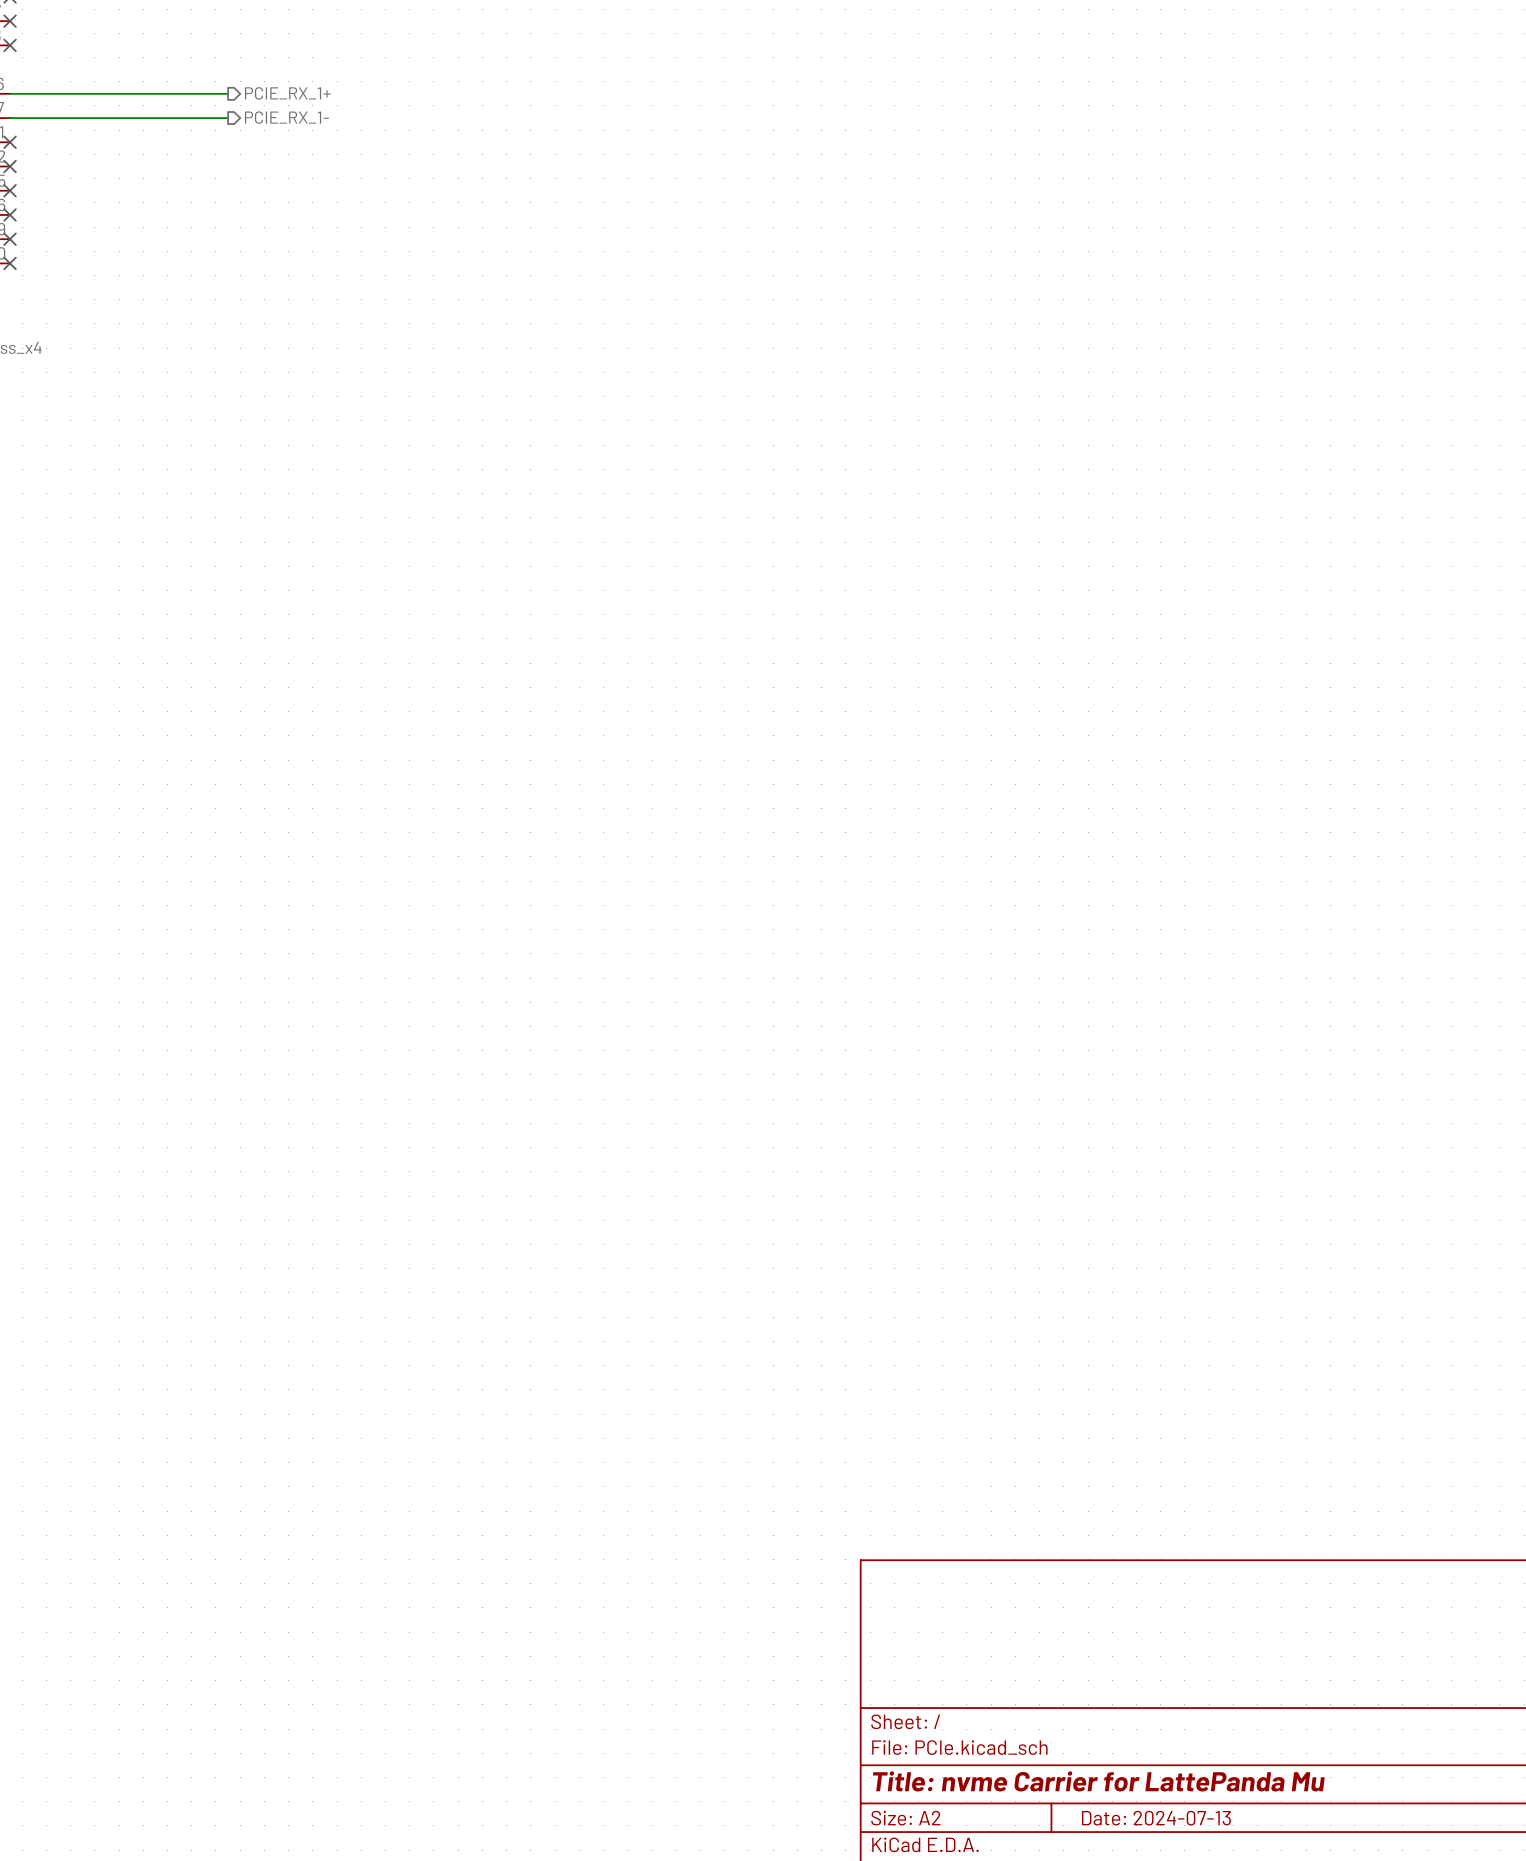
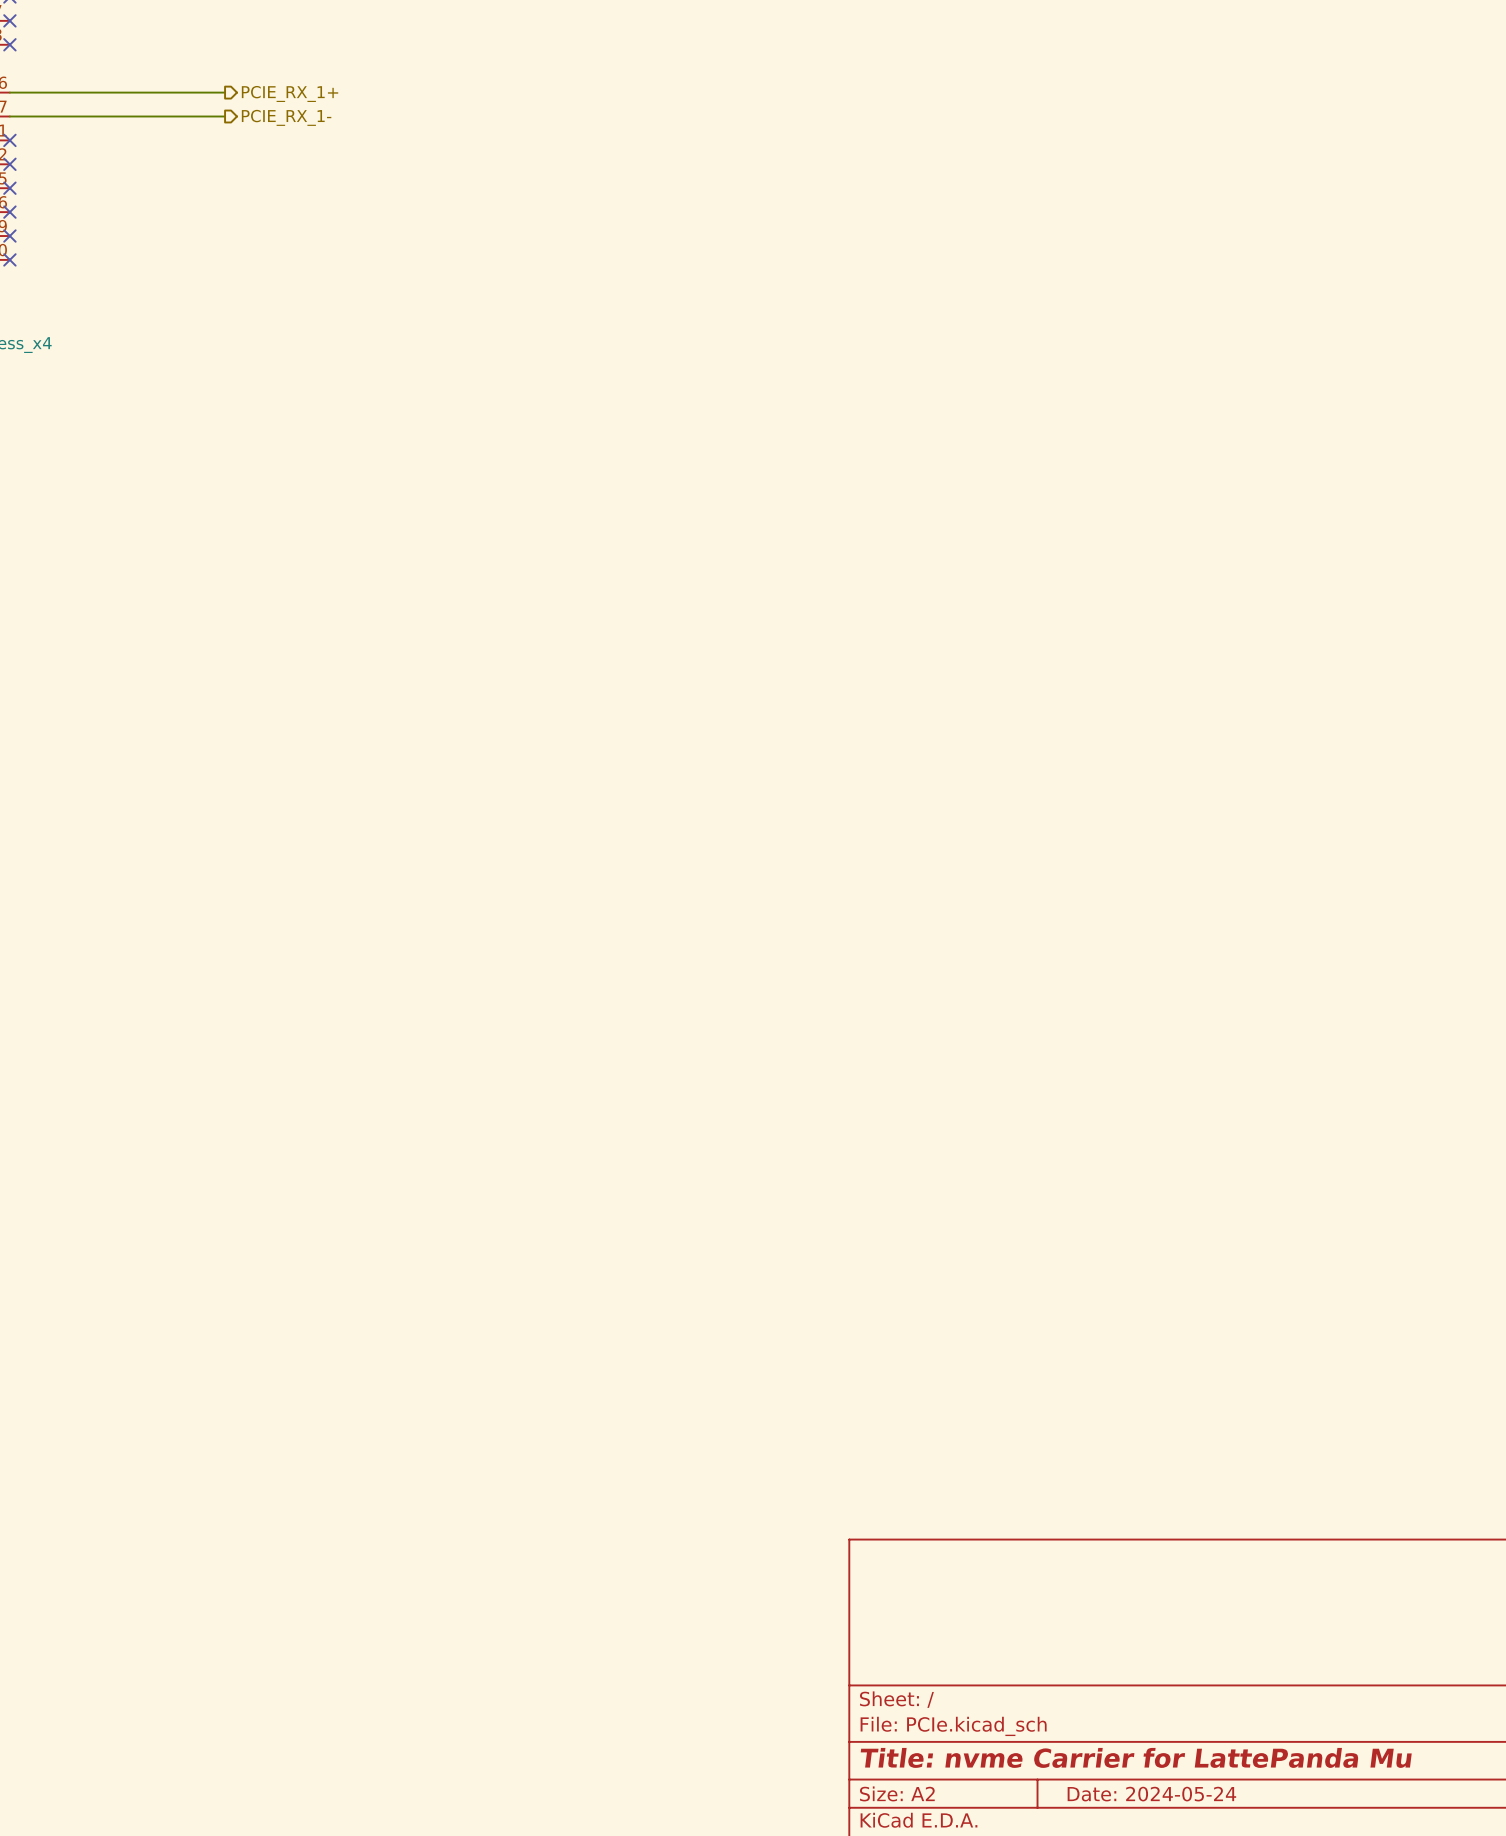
title block: Date: 2024-07-13 (1156, 1818) -> Date: 2024-05-24 (1151, 1794)

